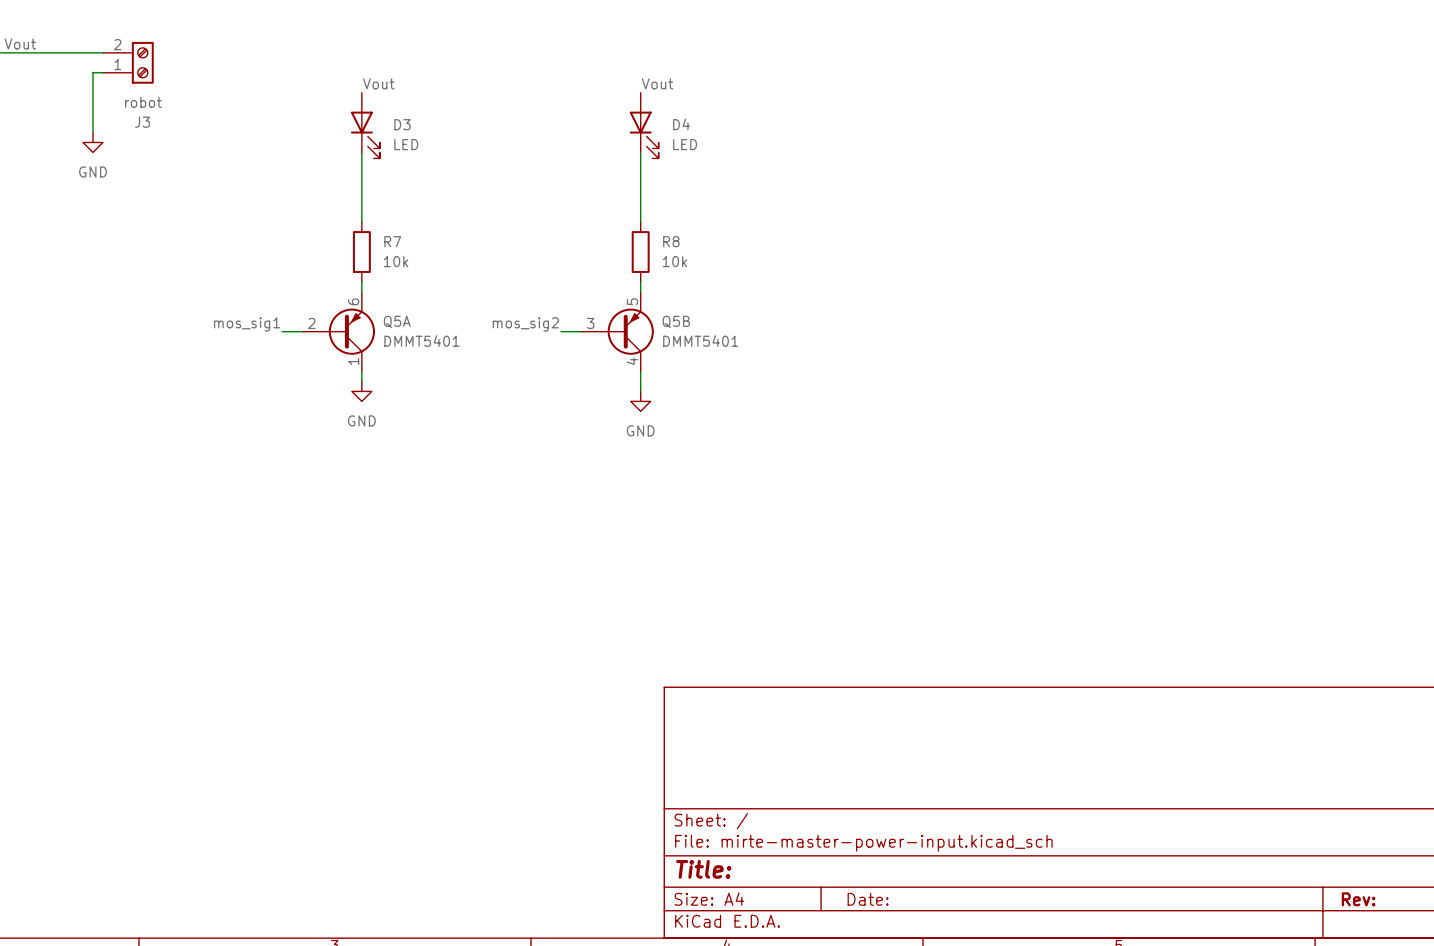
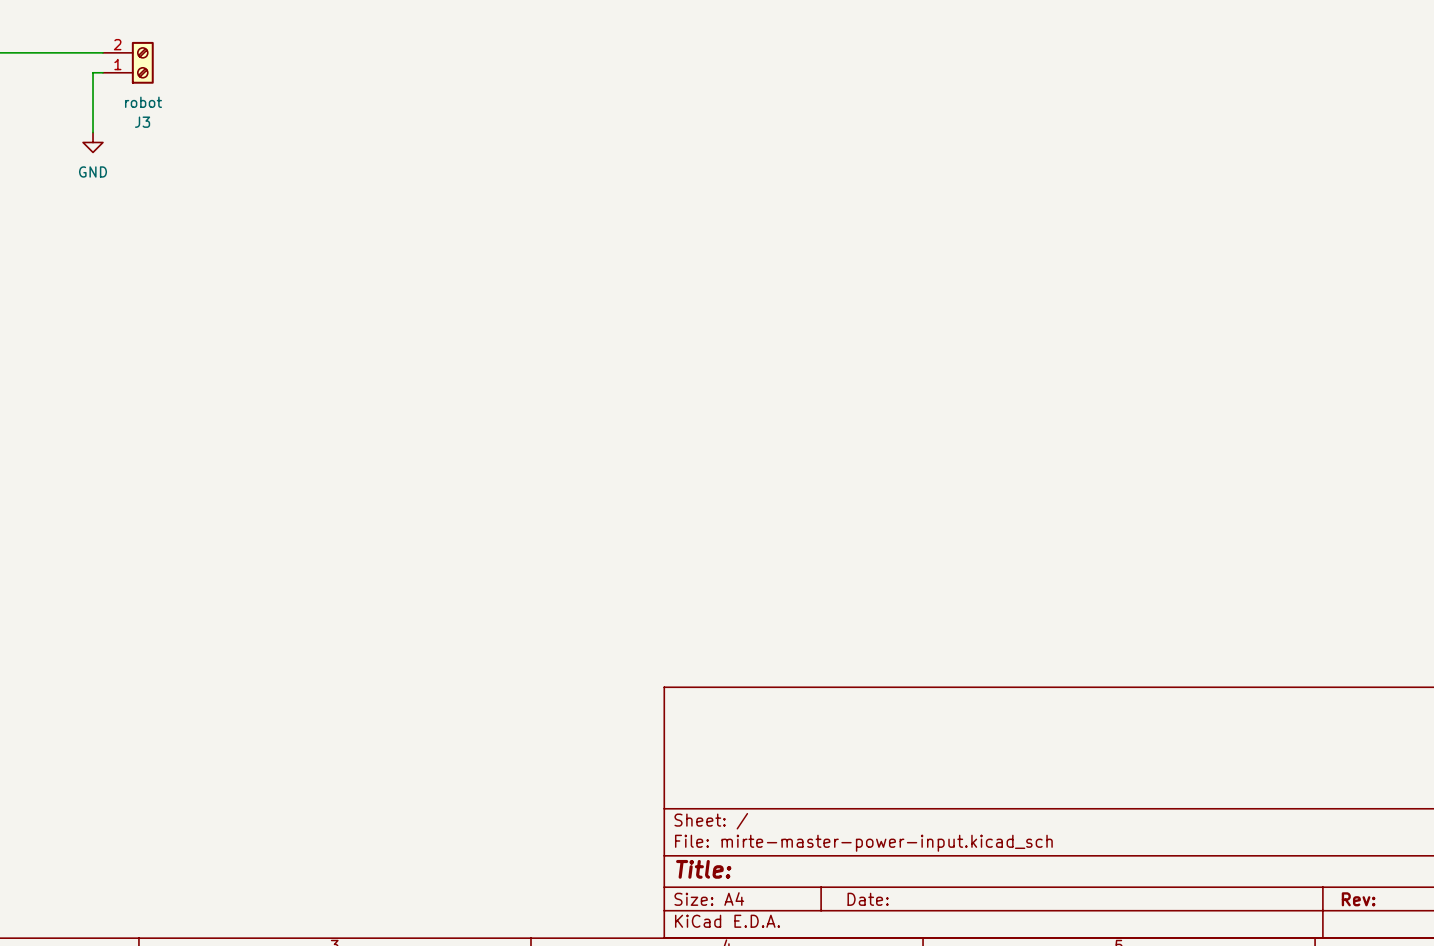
label: Vout (20, 43) -> none
label: Vout (378, 83) -> none
label: Vout (657, 83) -> none
D3: LED (365, 125) -> none
D4: LED (644, 125) -> none
wire: (361, 152) (361, 222) -> none
wire: (640, 152) (640, 222) -> none
R7: 10k (361, 252) -> none
R8: 10k (640, 252) -> none
wire: (361, 281) (361, 291) -> none
wire: (640, 281) (640, 291) -> none
label: mos_sig1 (247, 324) -> none
label: mos_sig2 (525, 324) -> none
wire: (282, 331) (302, 331) -> none
Q5A: DMMT5401 (338, 331) -> none
wire: (561, 331) (580, 331) -> none
Q5B: DMMT5401 (617, 331) -> none
wire: (361, 371) (361, 381) -> none
wire: (640, 371) (640, 391) -> none
power symbol: GND (361, 391) -> none
power symbol: GND (640, 401) -> none

